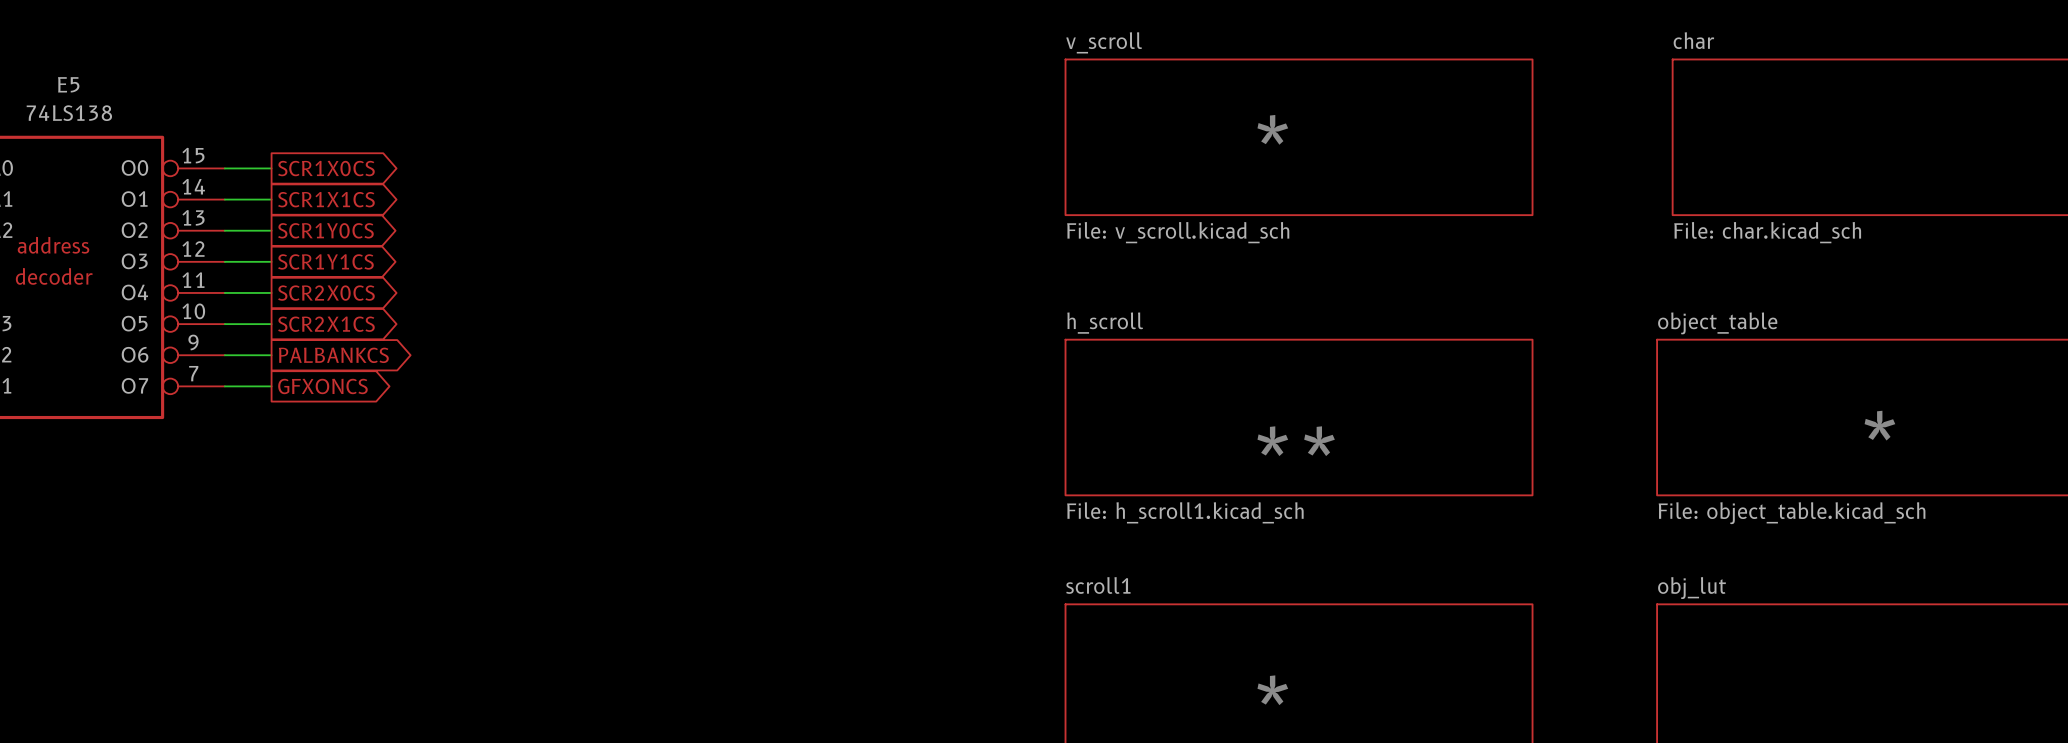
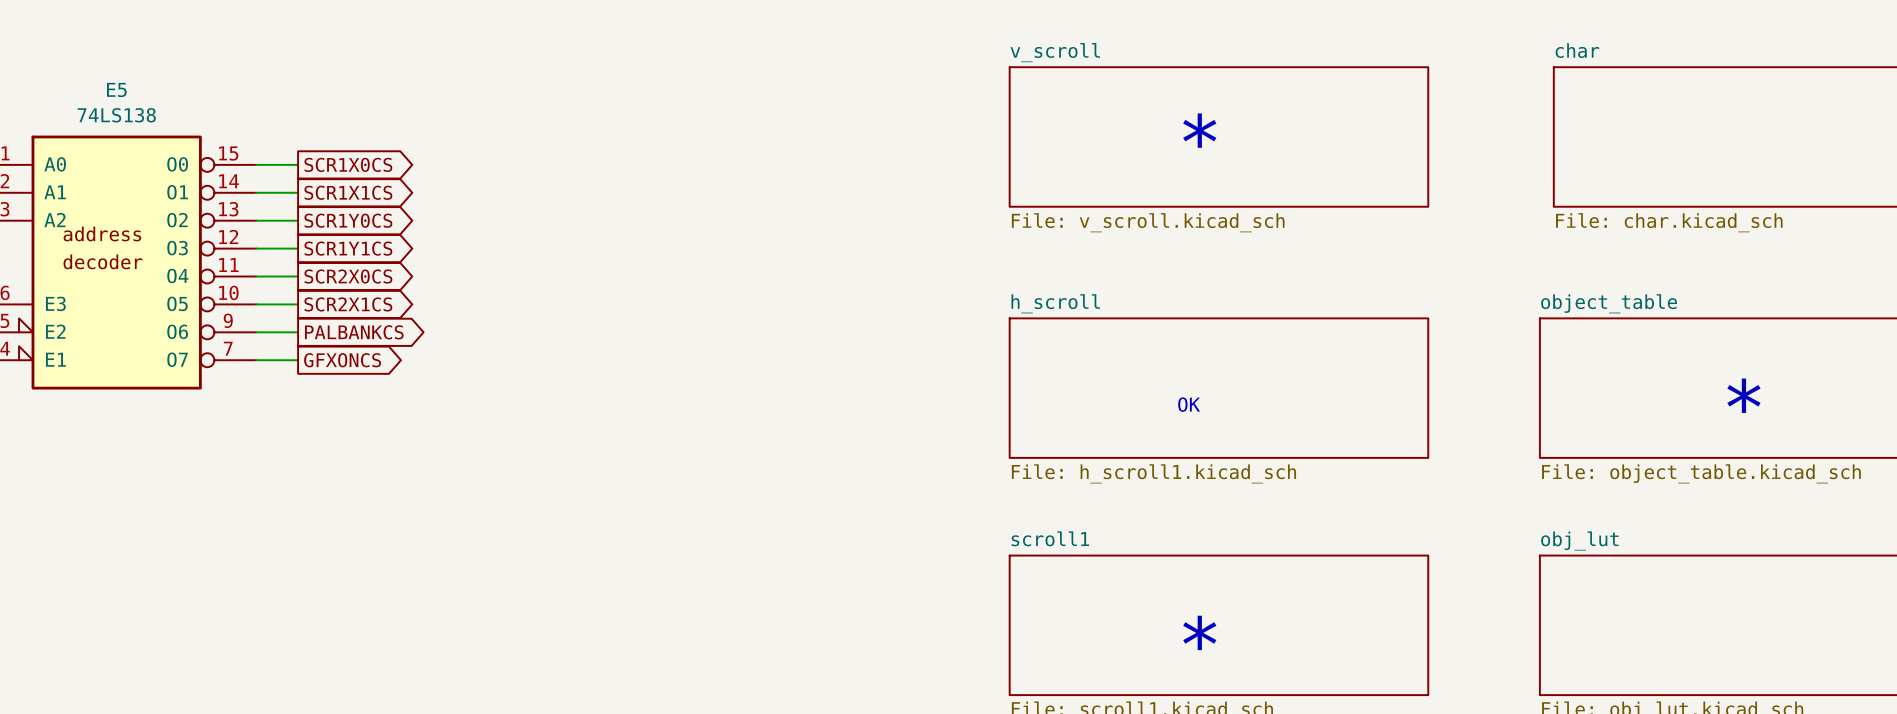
text: none -> OK (1189, 404)
text: * (1272, 441) -> none
text: * (1319, 441) -> none

